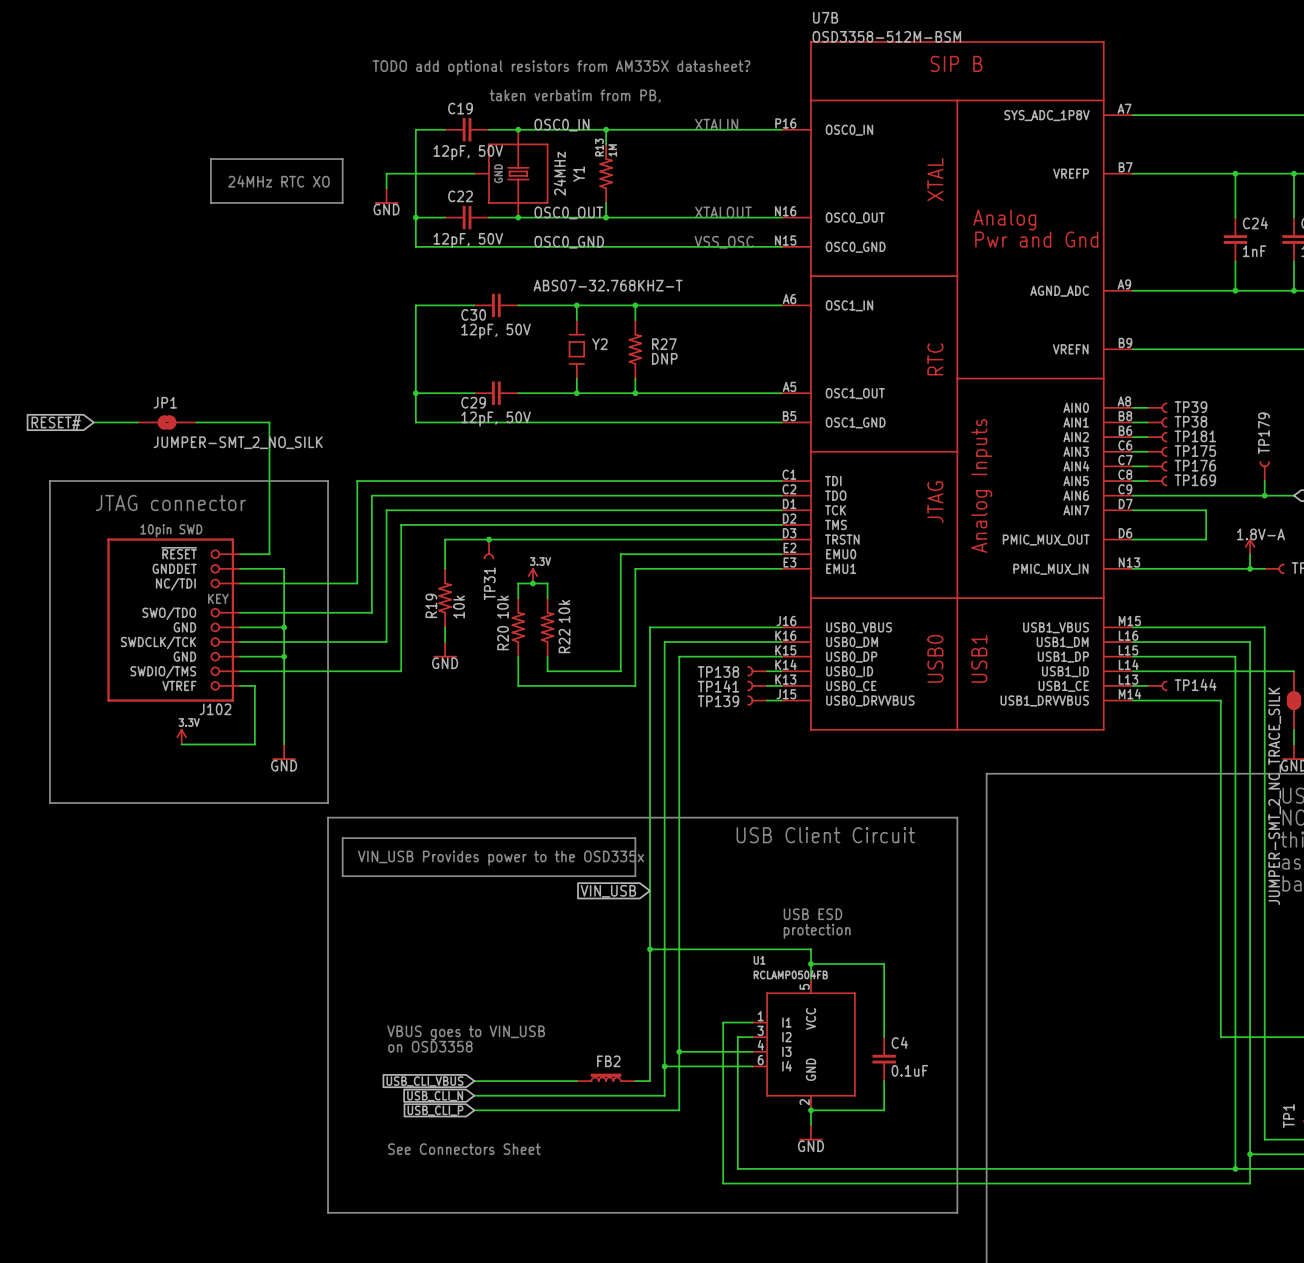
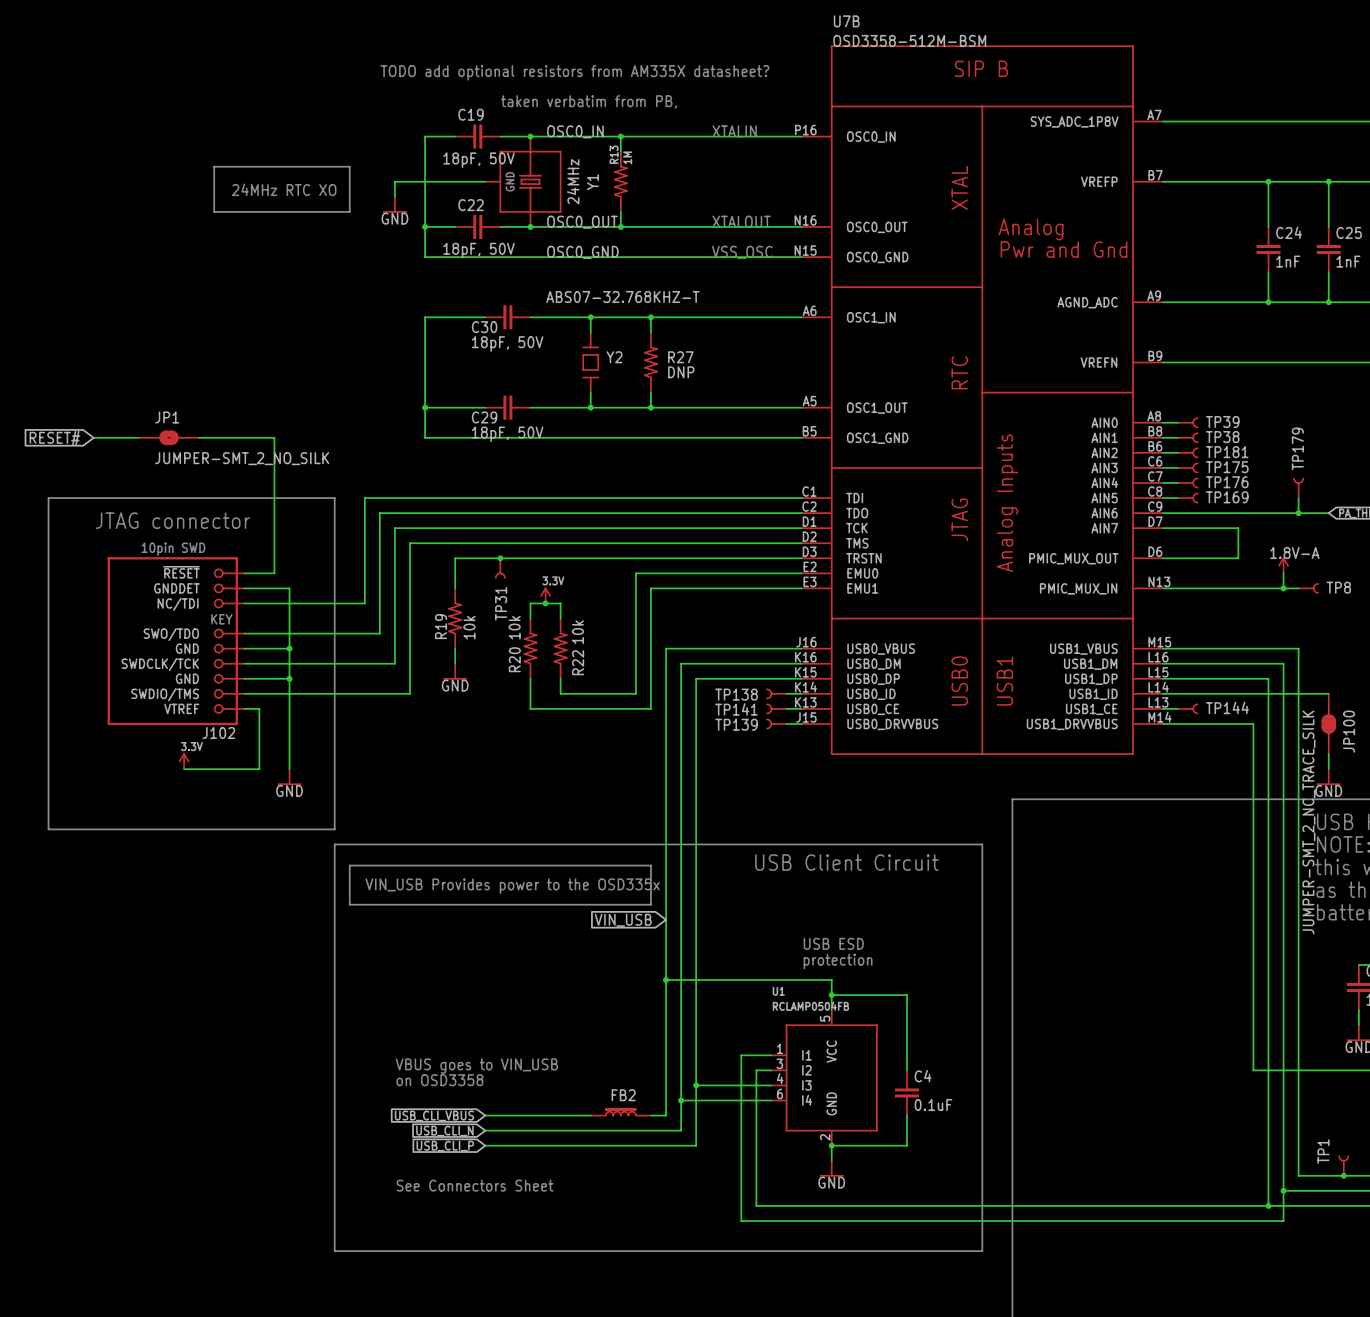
C19 value: 12pF, 50V (468, 152) -> 18pF, 50V (479, 160)
C22 value: 12pF, 50V (468, 240) -> 18pF, 50V (479, 250)
C30 value: 12pF, 50V (496, 331) -> 18pF, 50V (507, 343)
C29 value: 12pF, 50V (496, 419) -> 18pF, 50V (507, 434)

